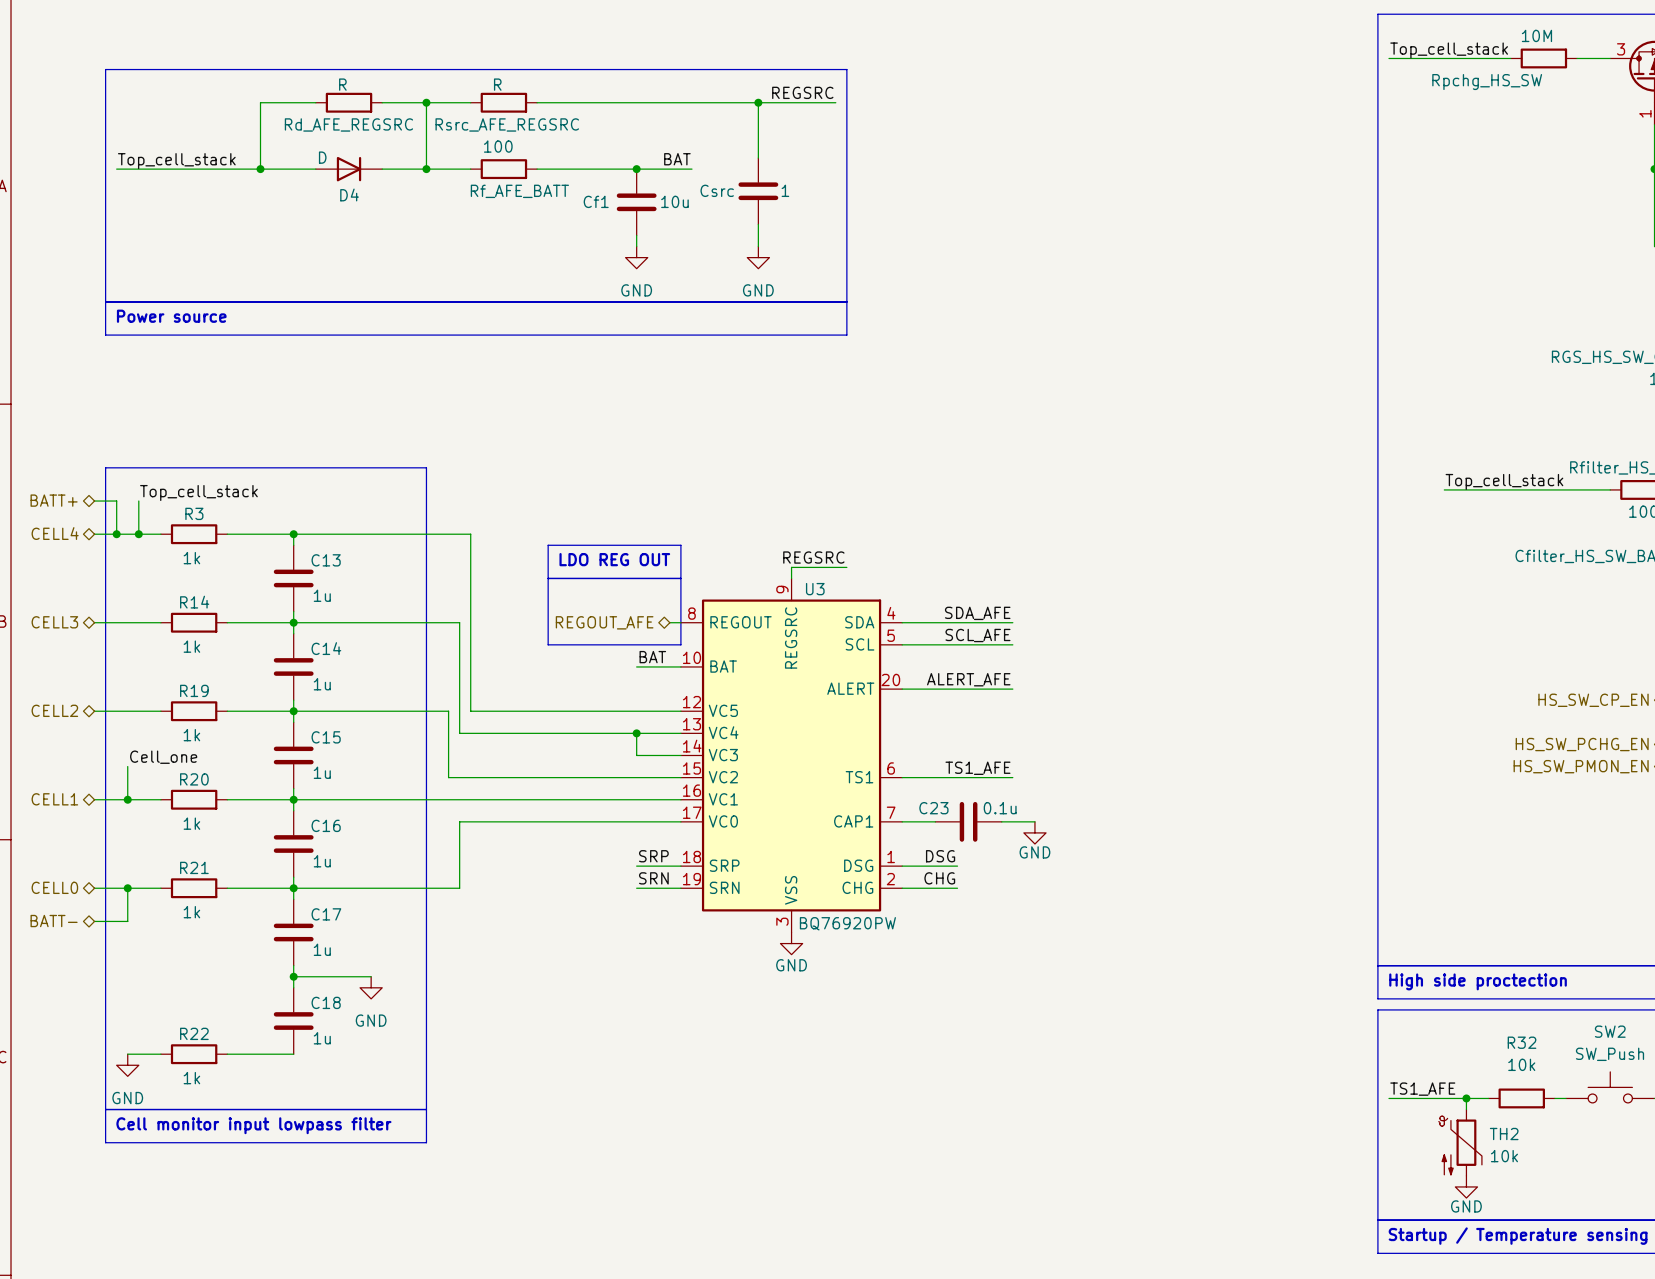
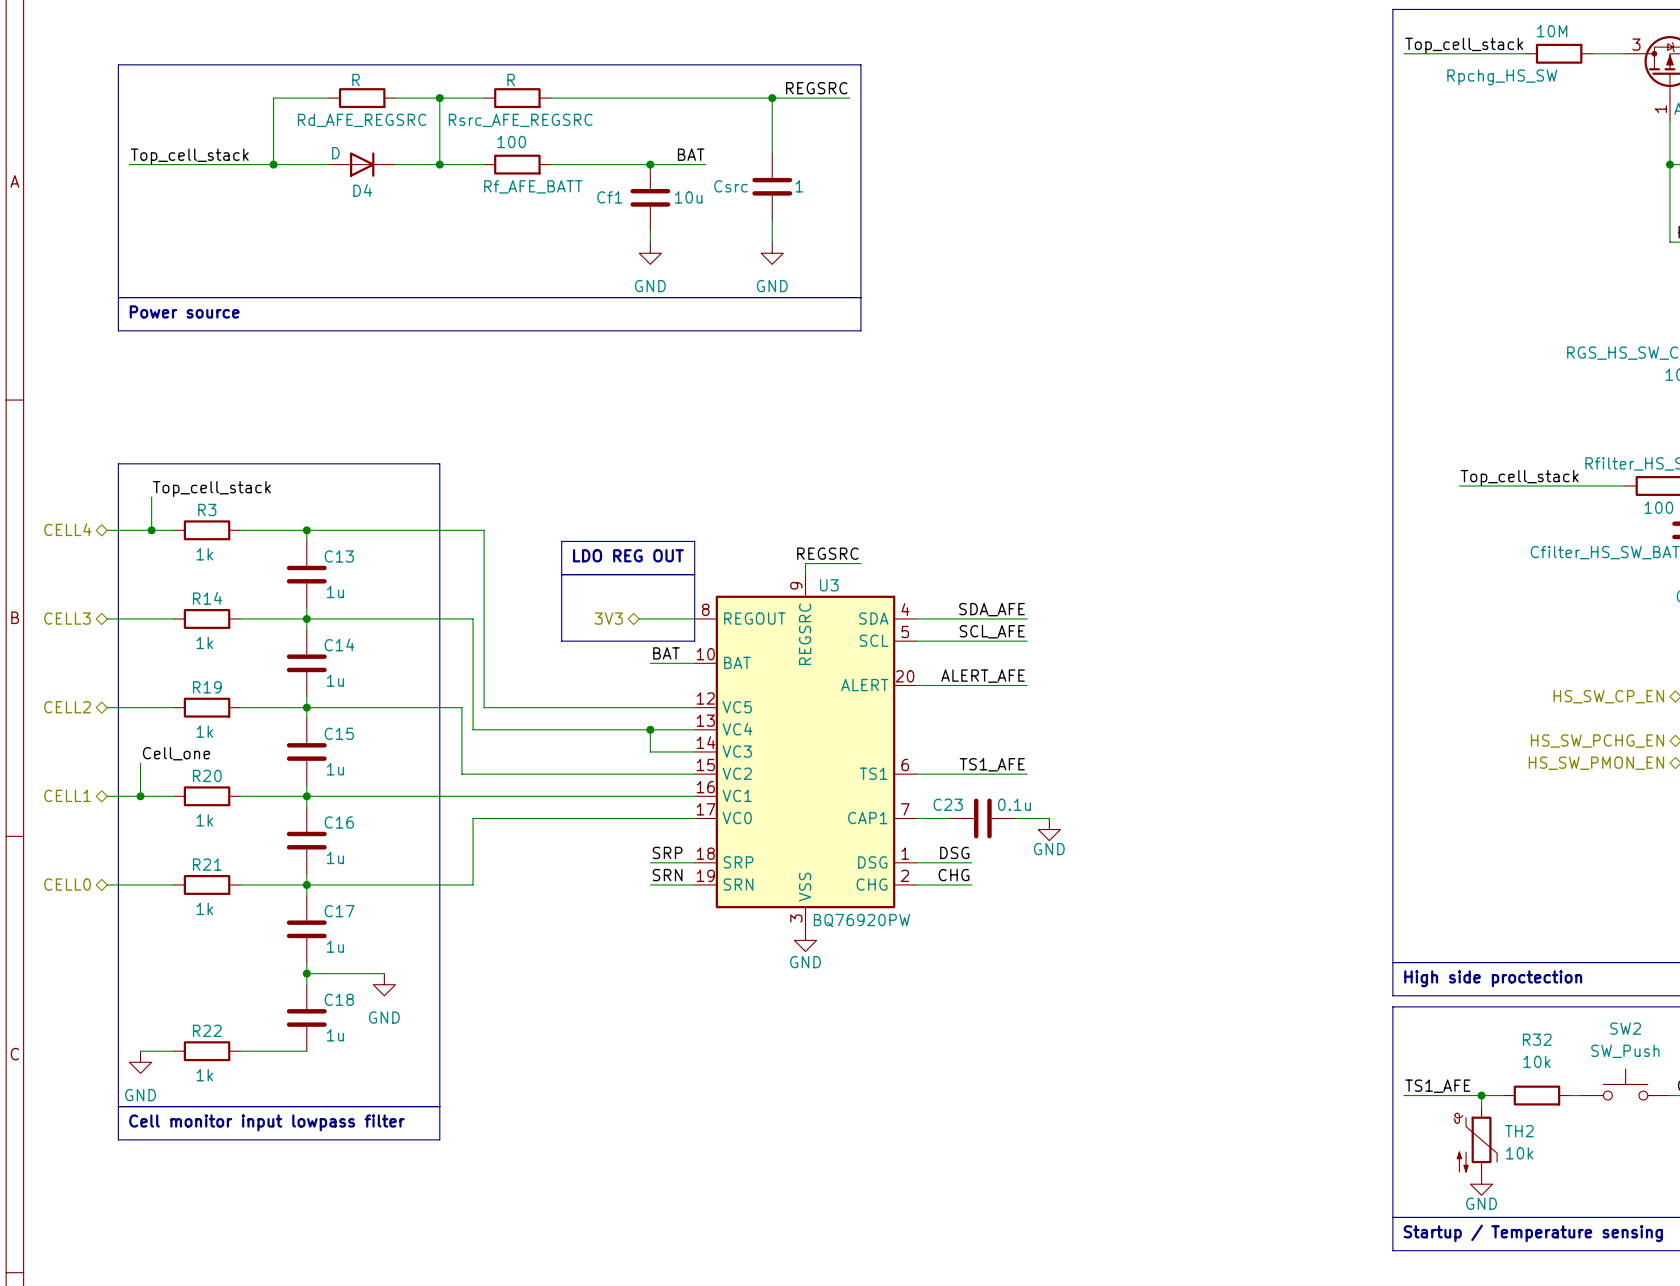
hierarchical label: BATT+ (54, 500) -> none
wire: (94, 501) (116, 501) (116, 534) -> none
junction: (116, 534) -> none
hierarchical label: none -> 3V3 (608, 618)
hierarchical label: REGOUT_AFE (604, 622) -> none
wire: none -> (639, 618) (683, 618)
wire: (127, 888) (127, 921) (94, 921) -> none
junction: (127, 888) -> none
hierarchical label: BATT- (54, 921) -> none

